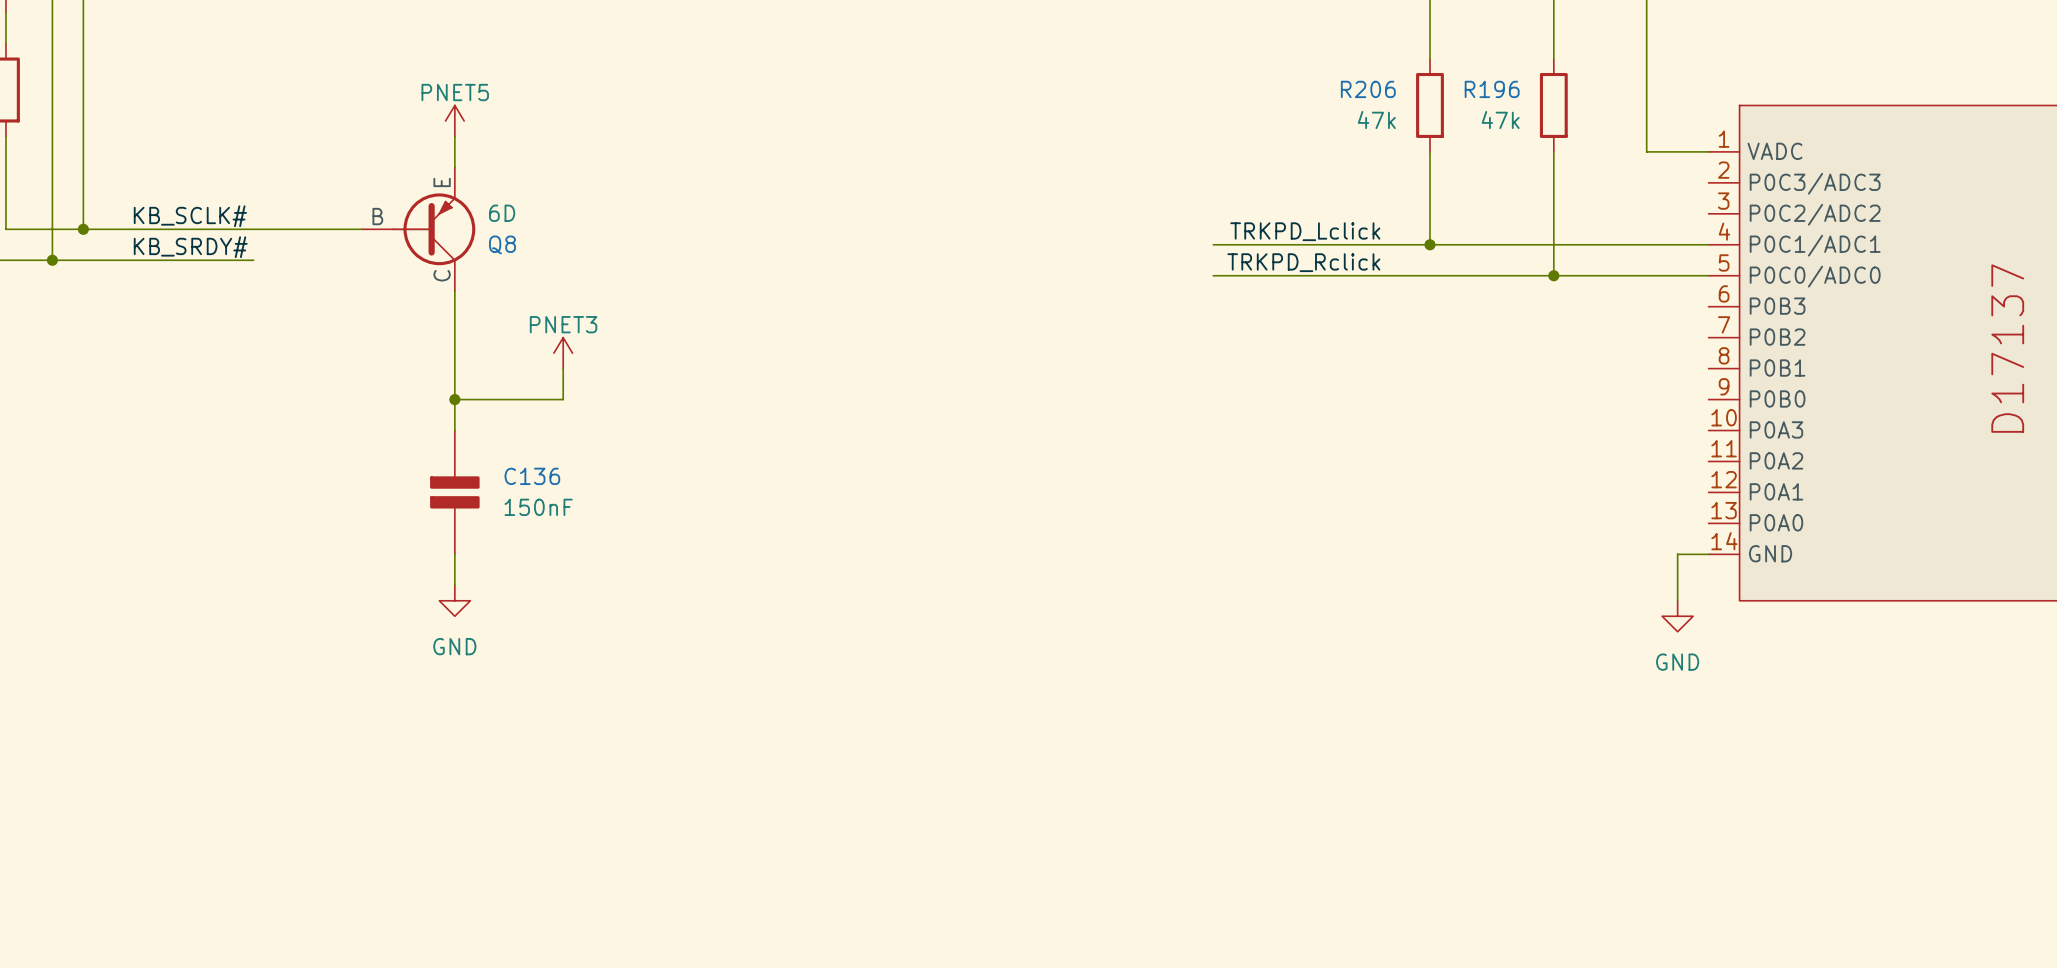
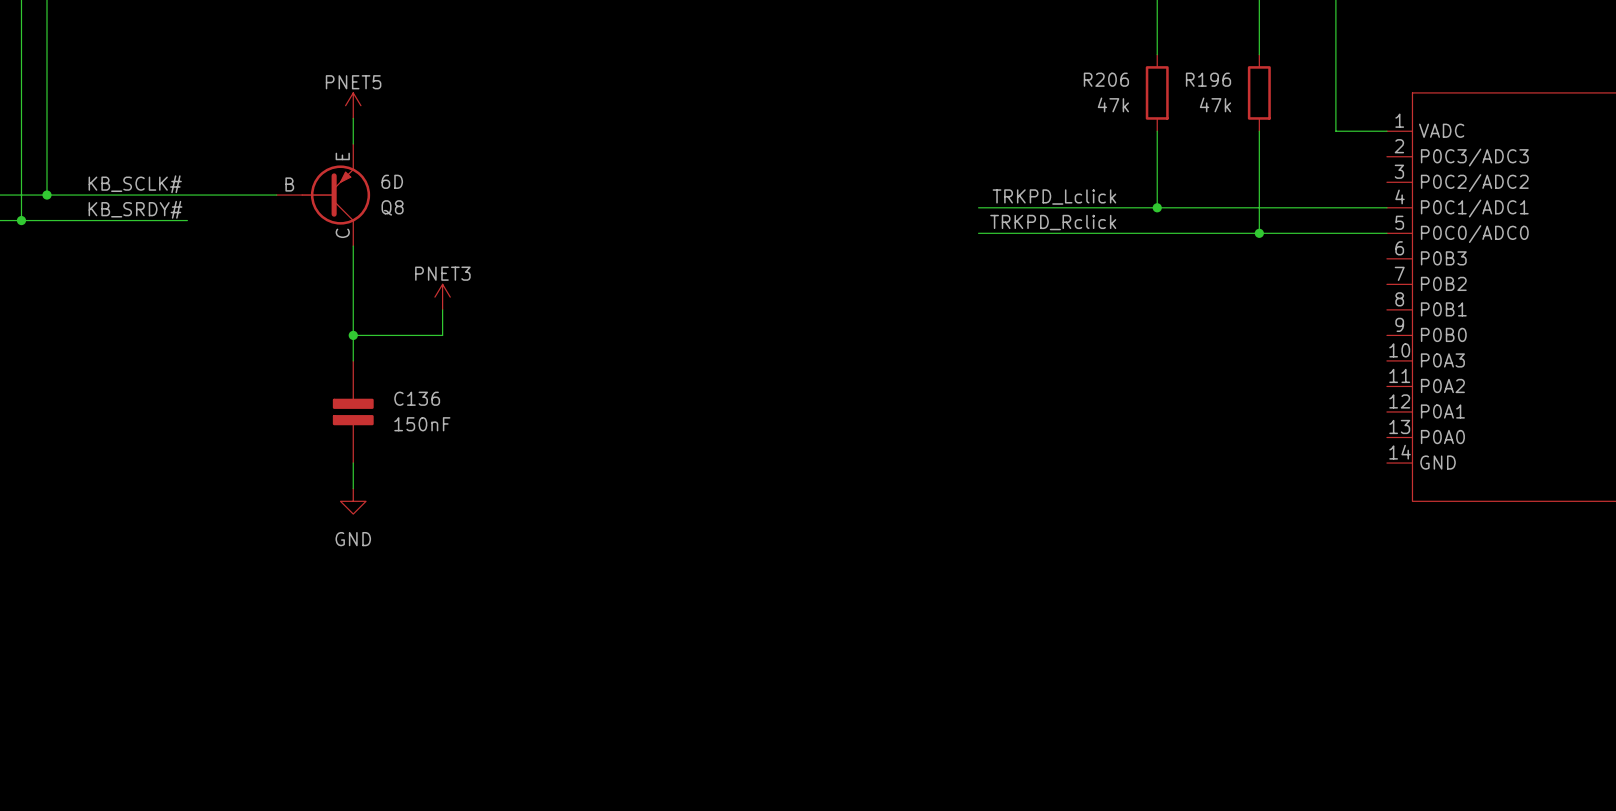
wire: (1708, 554) (1677, 554) (1677, 600) -> none
power symbol: GND (1677, 616) -> none

